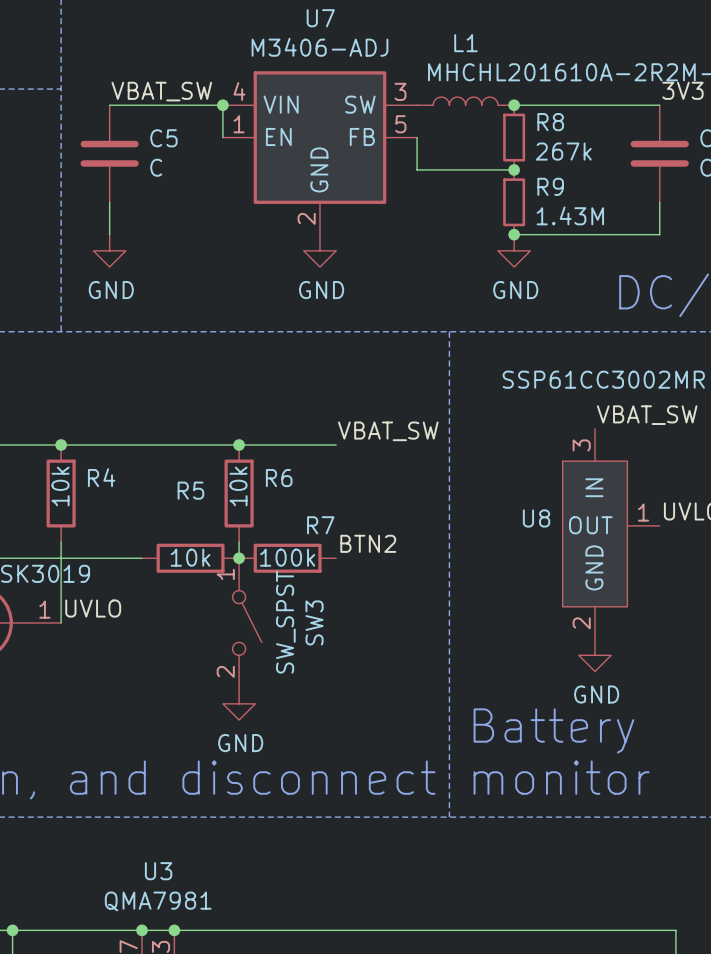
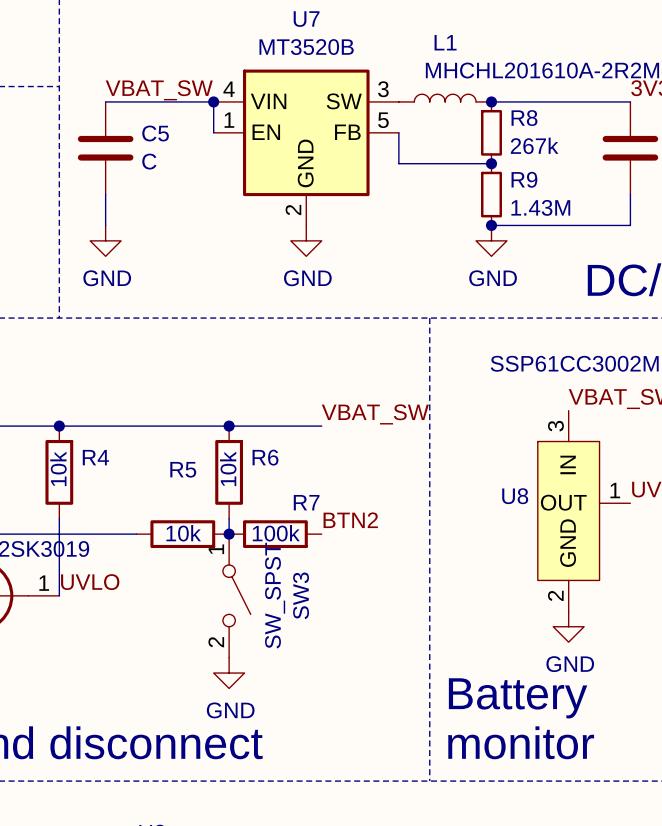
U7 value: M3406-ADJ (319, 47) -> MT3520B (306, 47)

